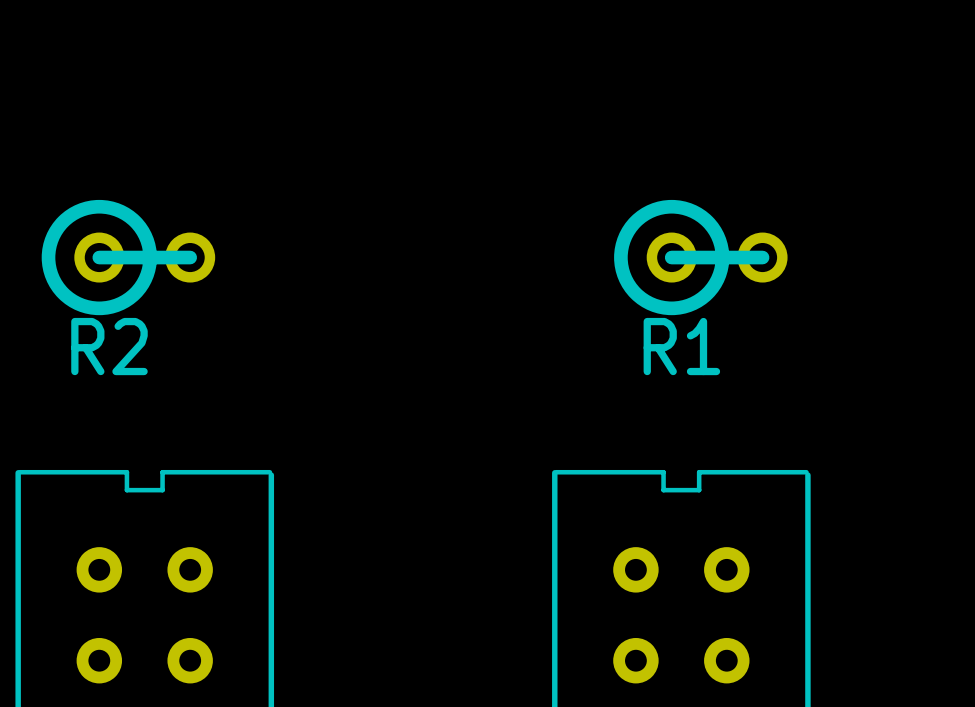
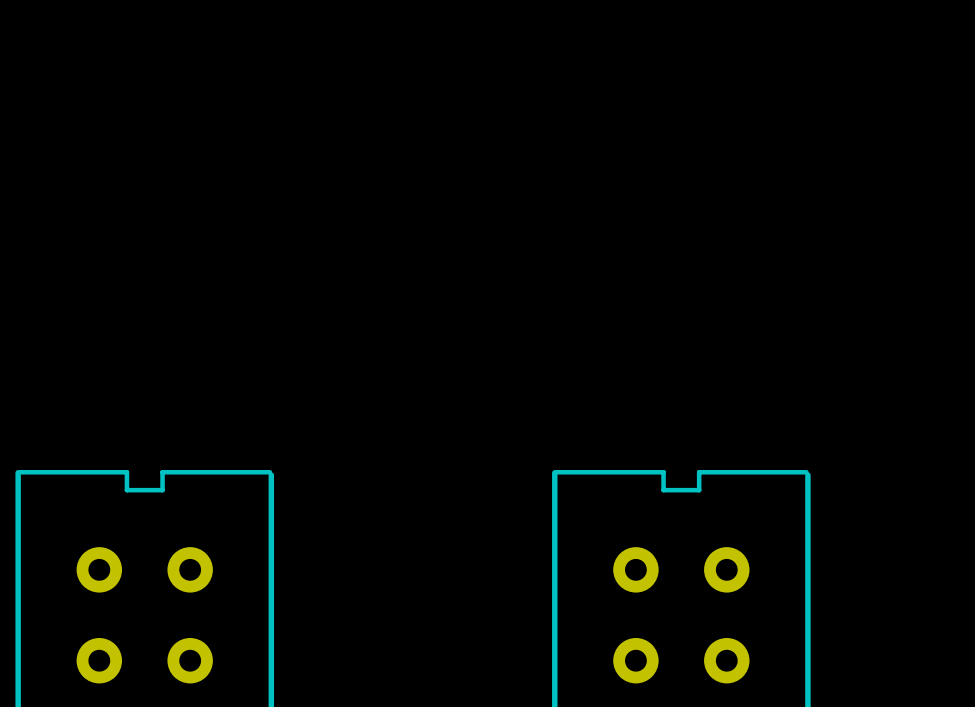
R2: (128, 257) -> none
R1: (700, 257) -> none

